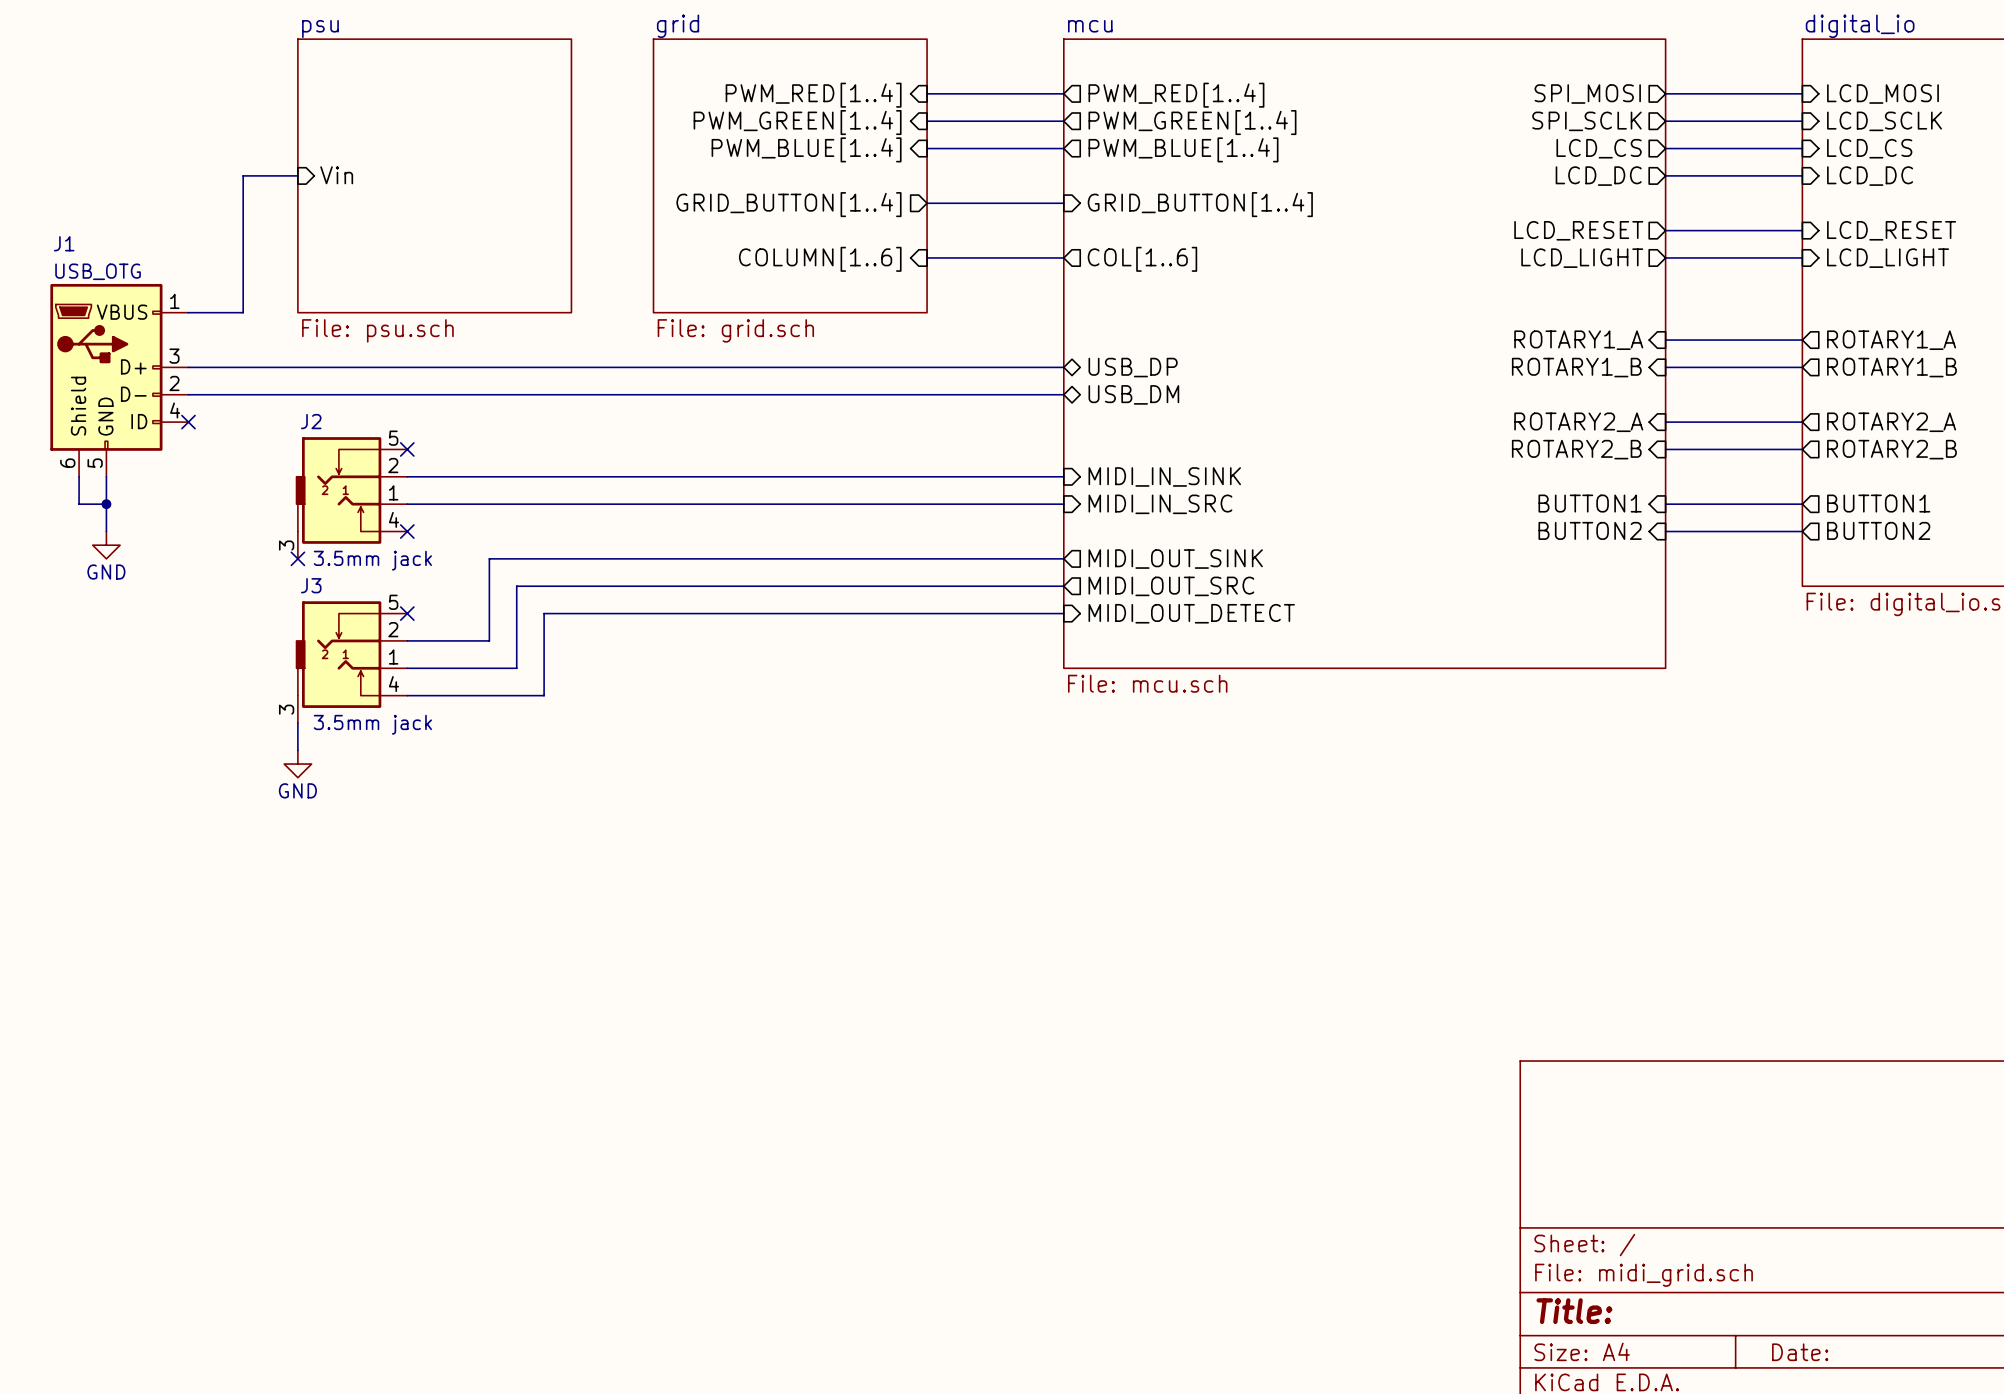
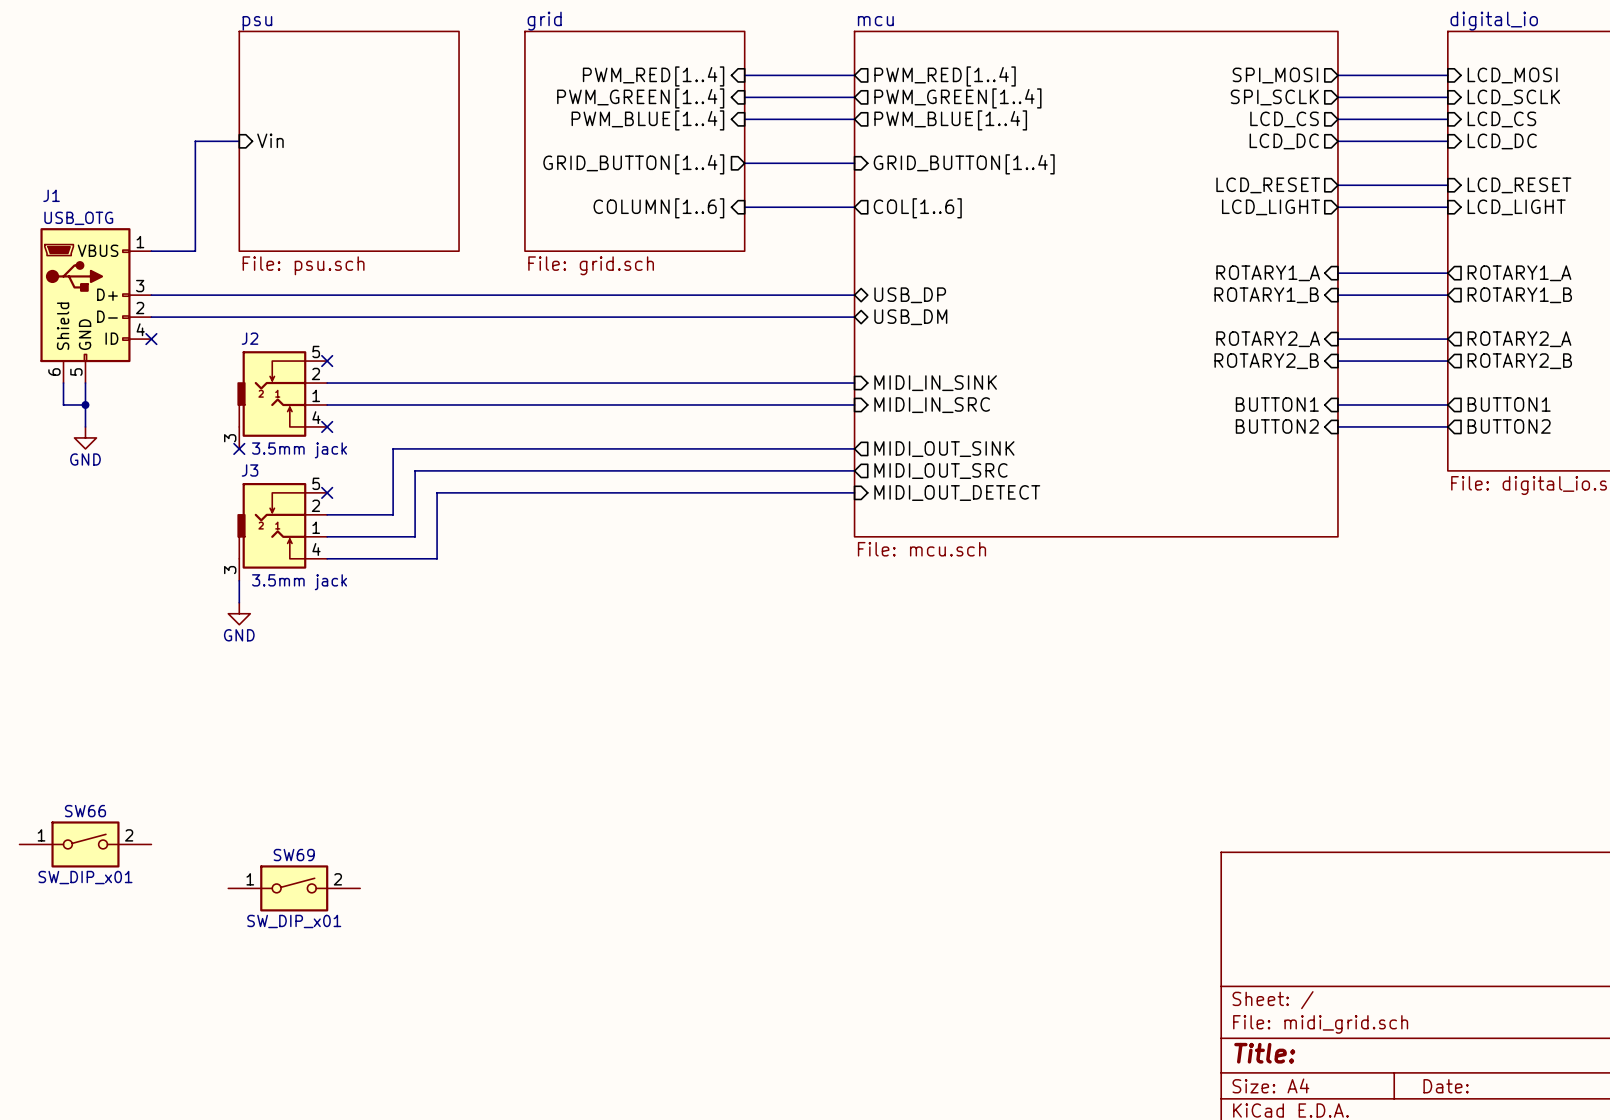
SW66: none -> SW_DIP_x01 (85, 844)
SW69: none -> SW_DIP_x01 (294, 888)

